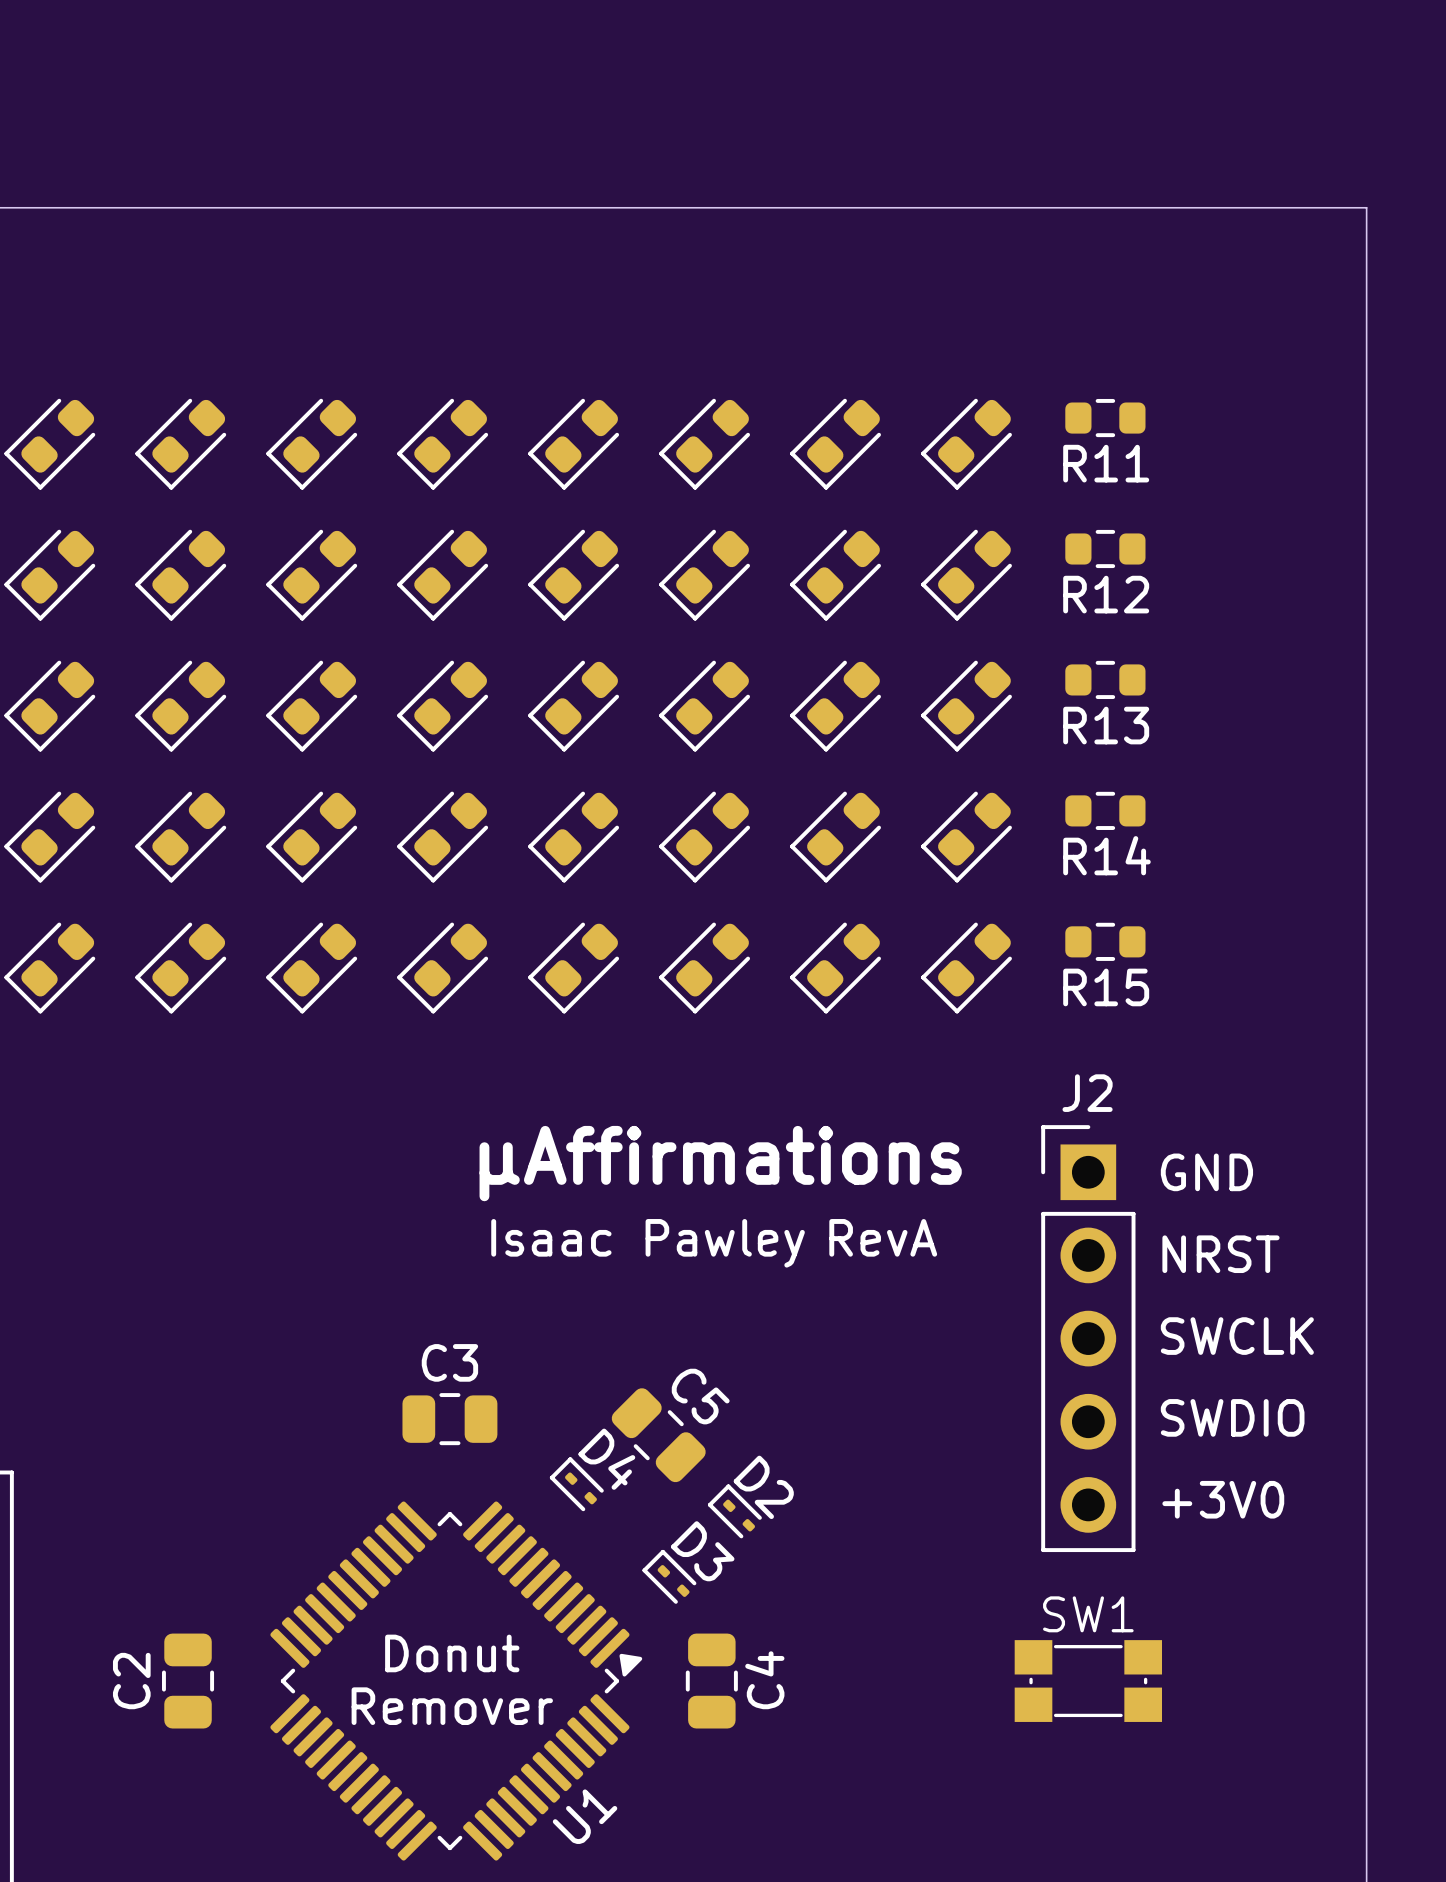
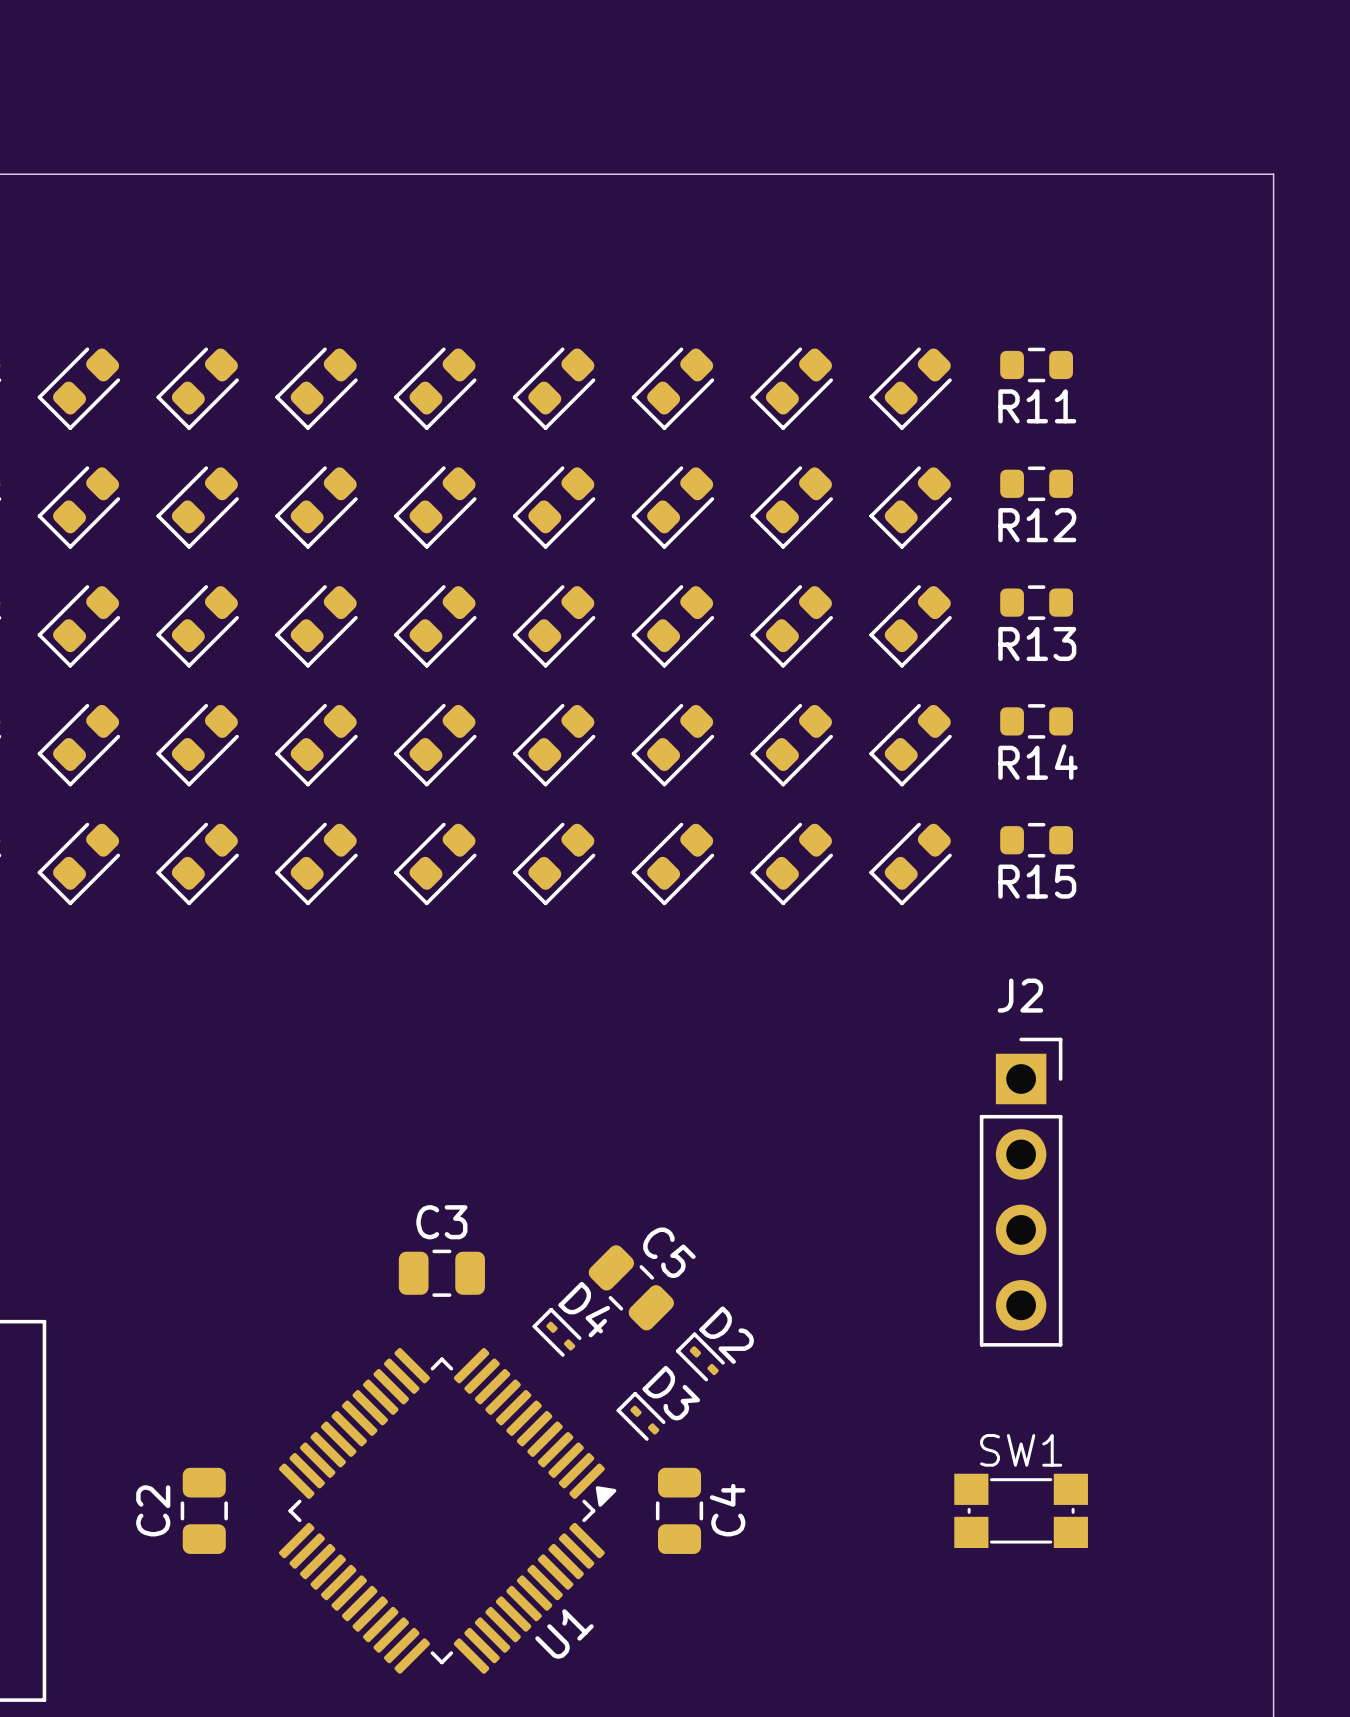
J2 footprint: [1041, 1125, 1136, 1553] -> [979, 1037, 1063, 1347]
text: μAffirmations (720, 1163) -> none
text: GND (1206, 1172) -> none
text: RevA (883, 1237) -> none
text: Isaac Pawley (648, 1243) -> none
text: NRST (1220, 1254) -> none
text: SWCLK (1237, 1336) -> none
text: SWDIO (1232, 1417) -> none
text: +3V0 (1223, 1499) -> none
text: Donut (452, 1653) -> none
text: Remover (452, 1706) -> none

